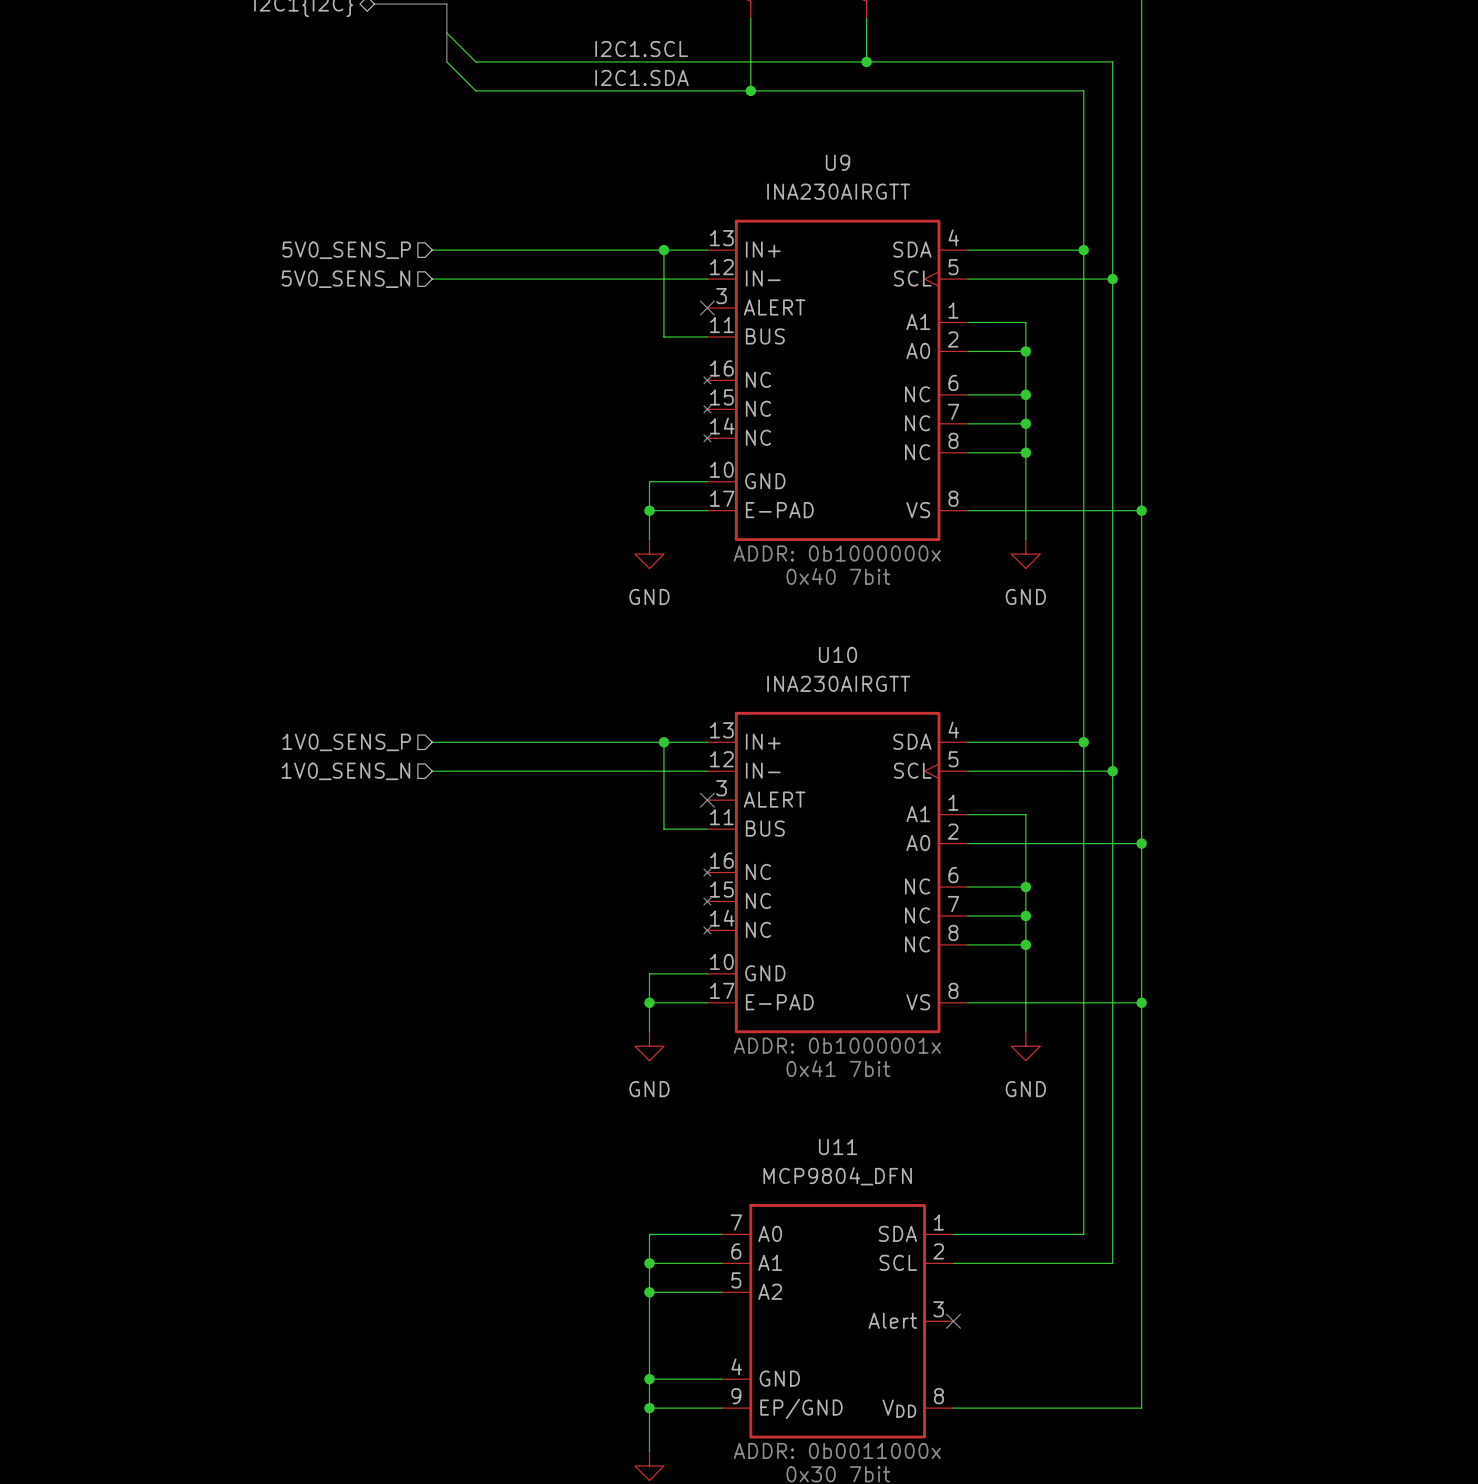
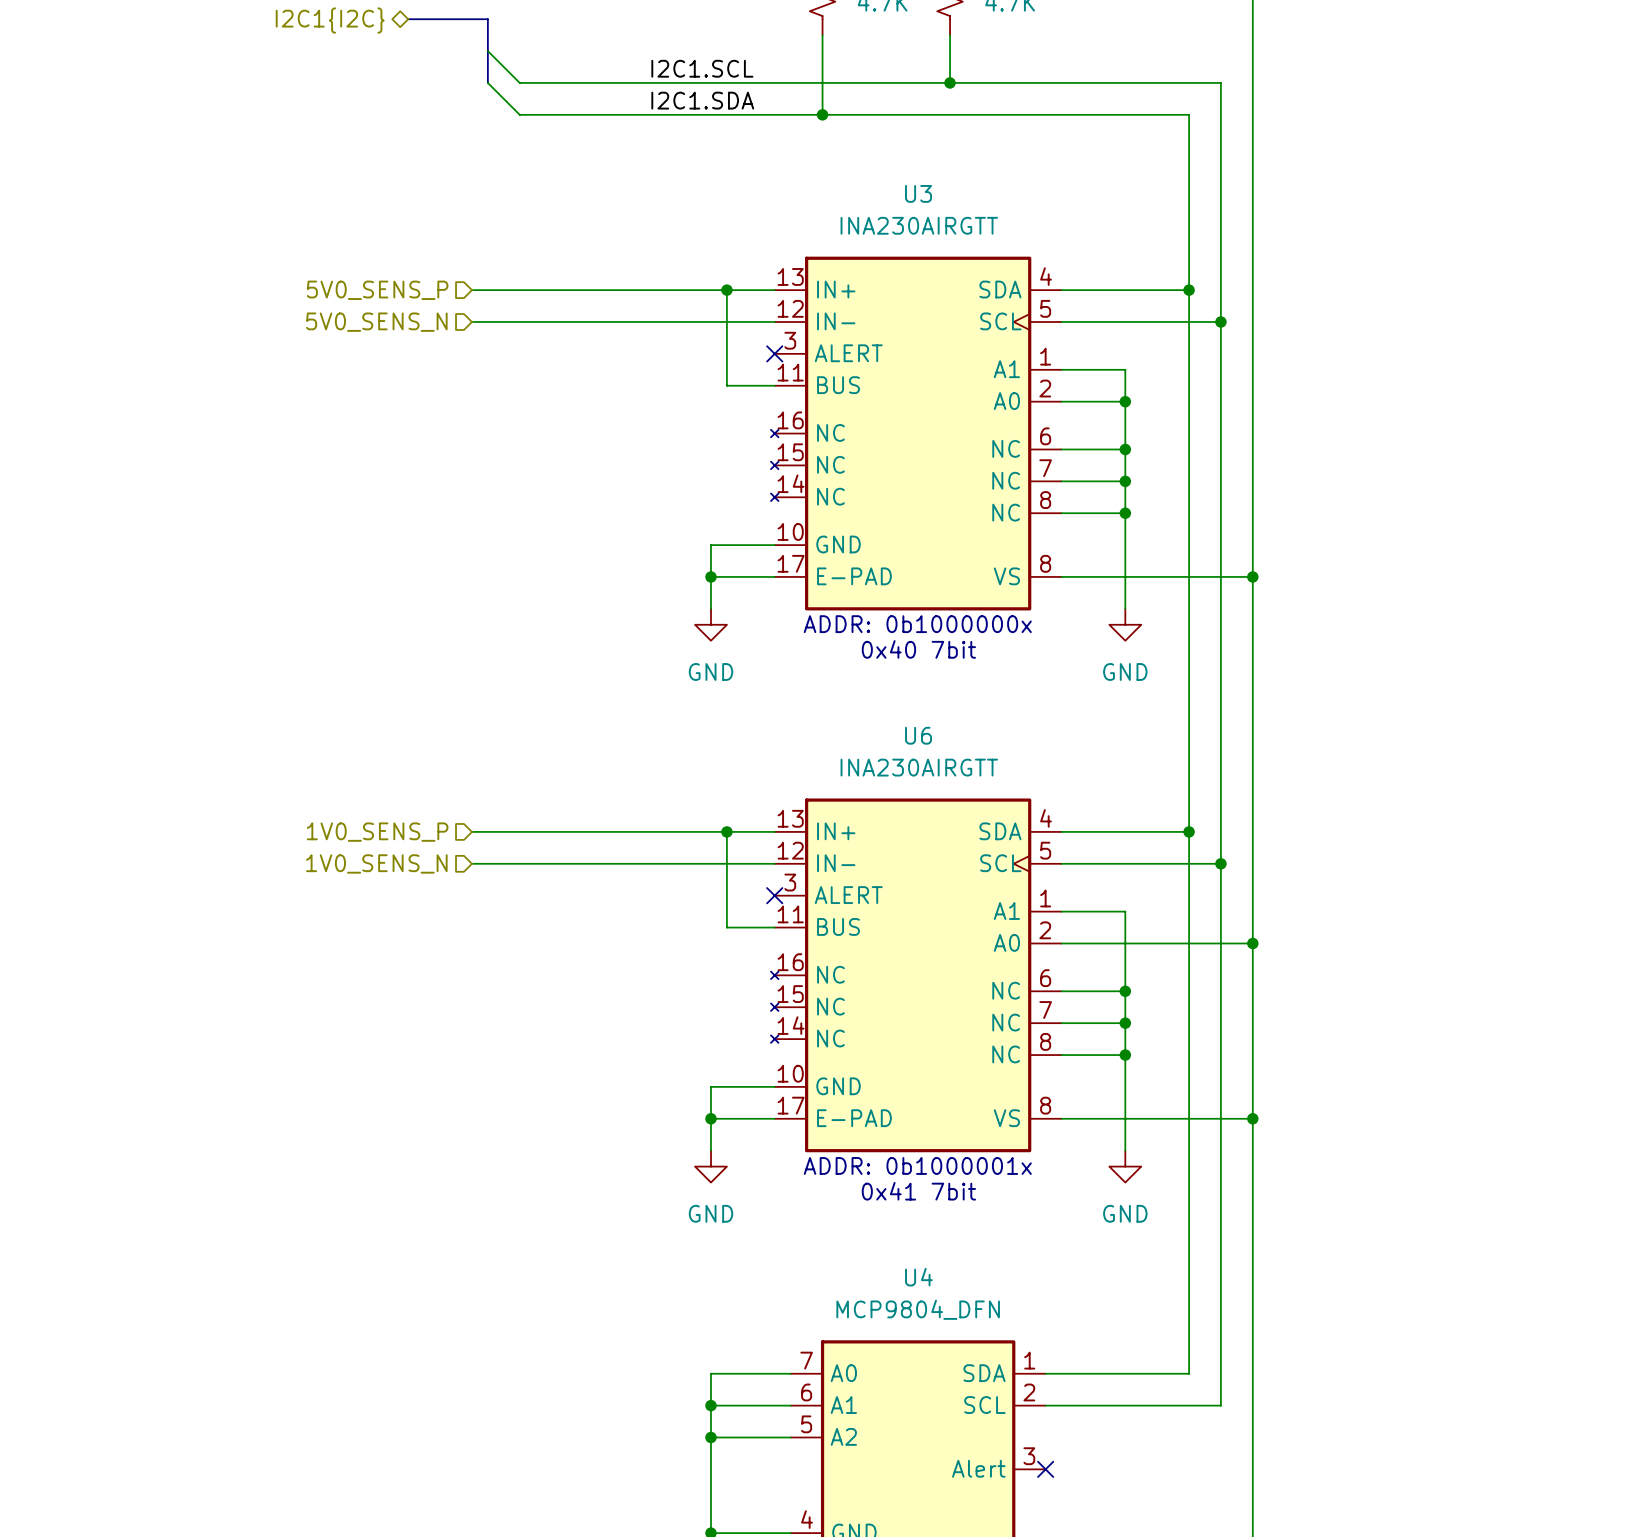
U9 name: U9 (838, 162) -> U3 (918, 193)
U10 name: U10 (838, 654) -> U6 (918, 735)
U11 name: U11 (838, 1147) -> U4 (918, 1277)

